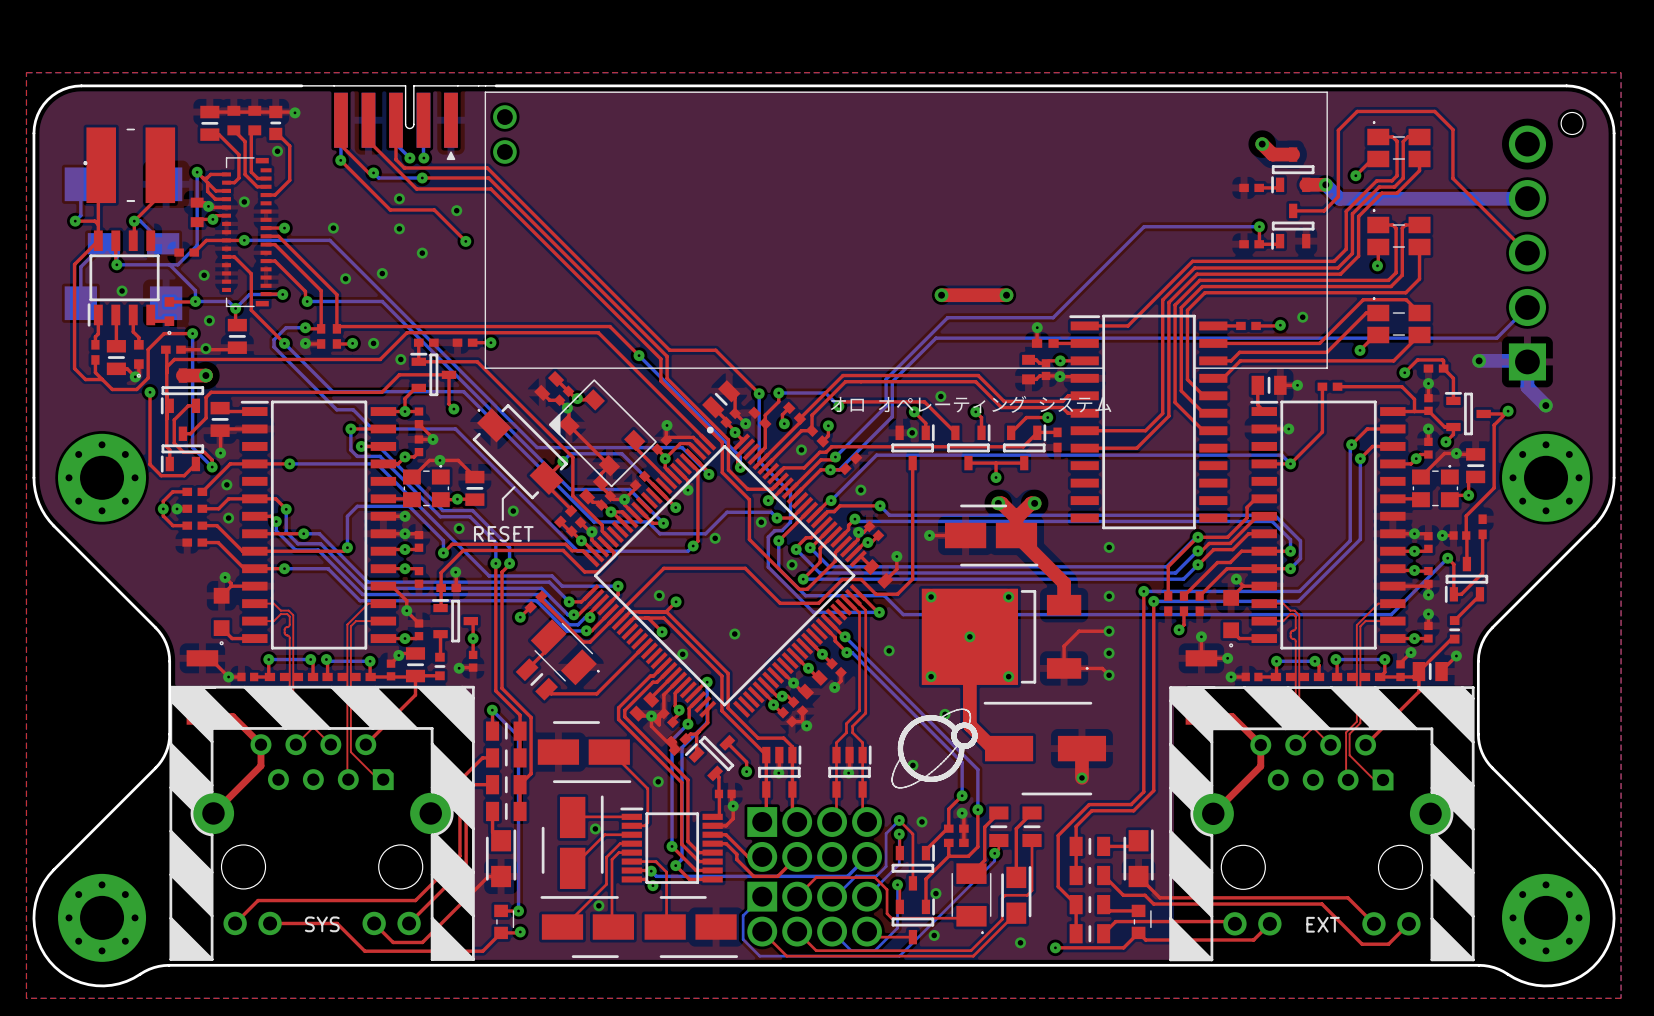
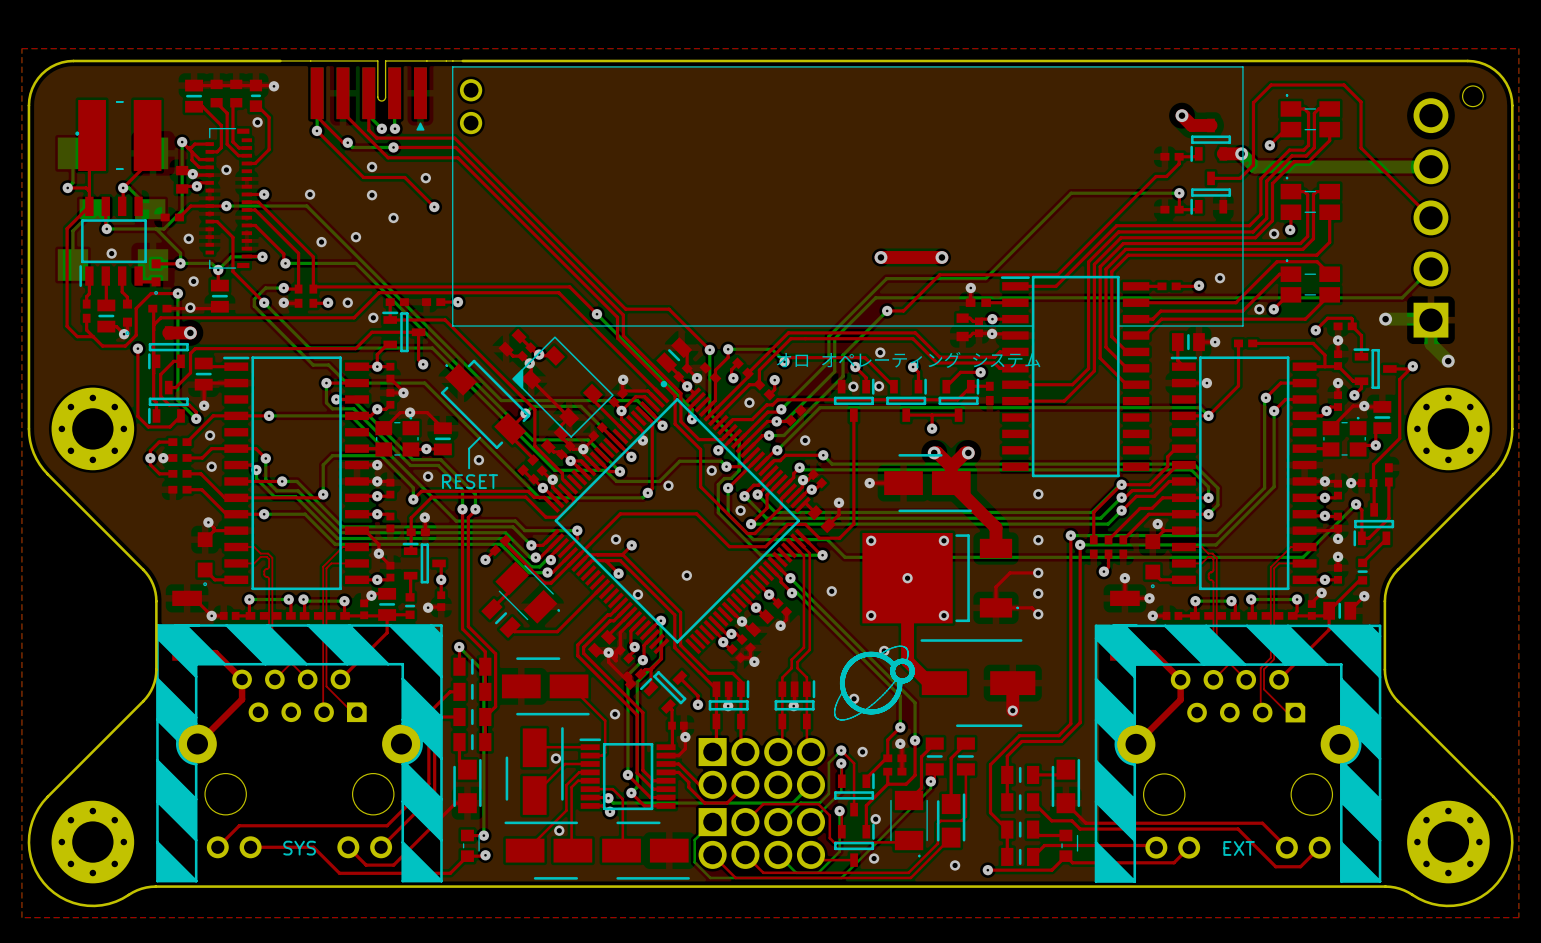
top track: none -> (1179, 156) (1179, 163) (1166, 176) (1156, 176) (1057, 274) (939, 274) (903, 310) (887, 310)
via: none -> (1274, 233)
via: none -> (1259, 309)
bottom track: none -> (887, 310) (843, 355) (843, 376) (783, 435) (769, 435)
via: none -> (887, 310)
via: none -> (878, 386)
top track: none -> (769, 435) (762, 435) (747, 450)
via: none -> (769, 435)

